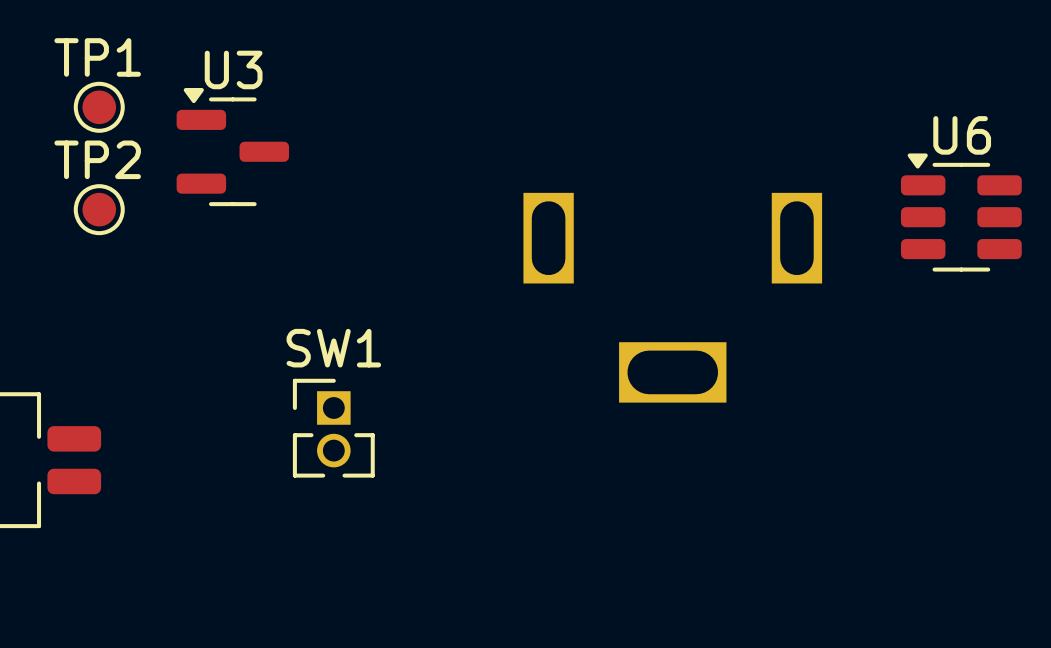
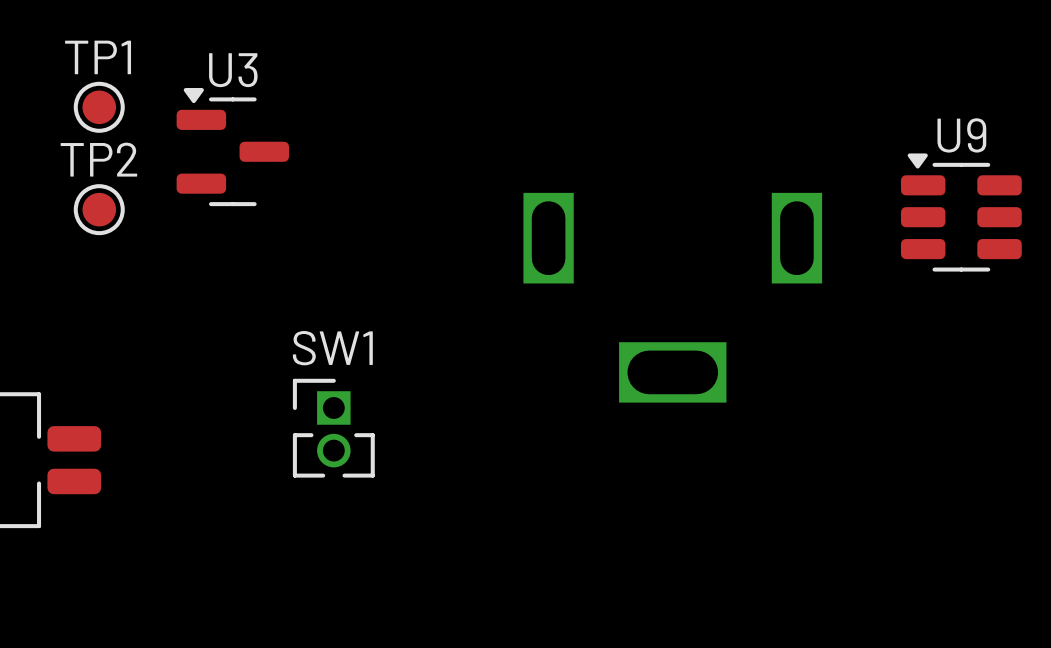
U6 name: U6 (962, 135) -> U9 (961, 135)

